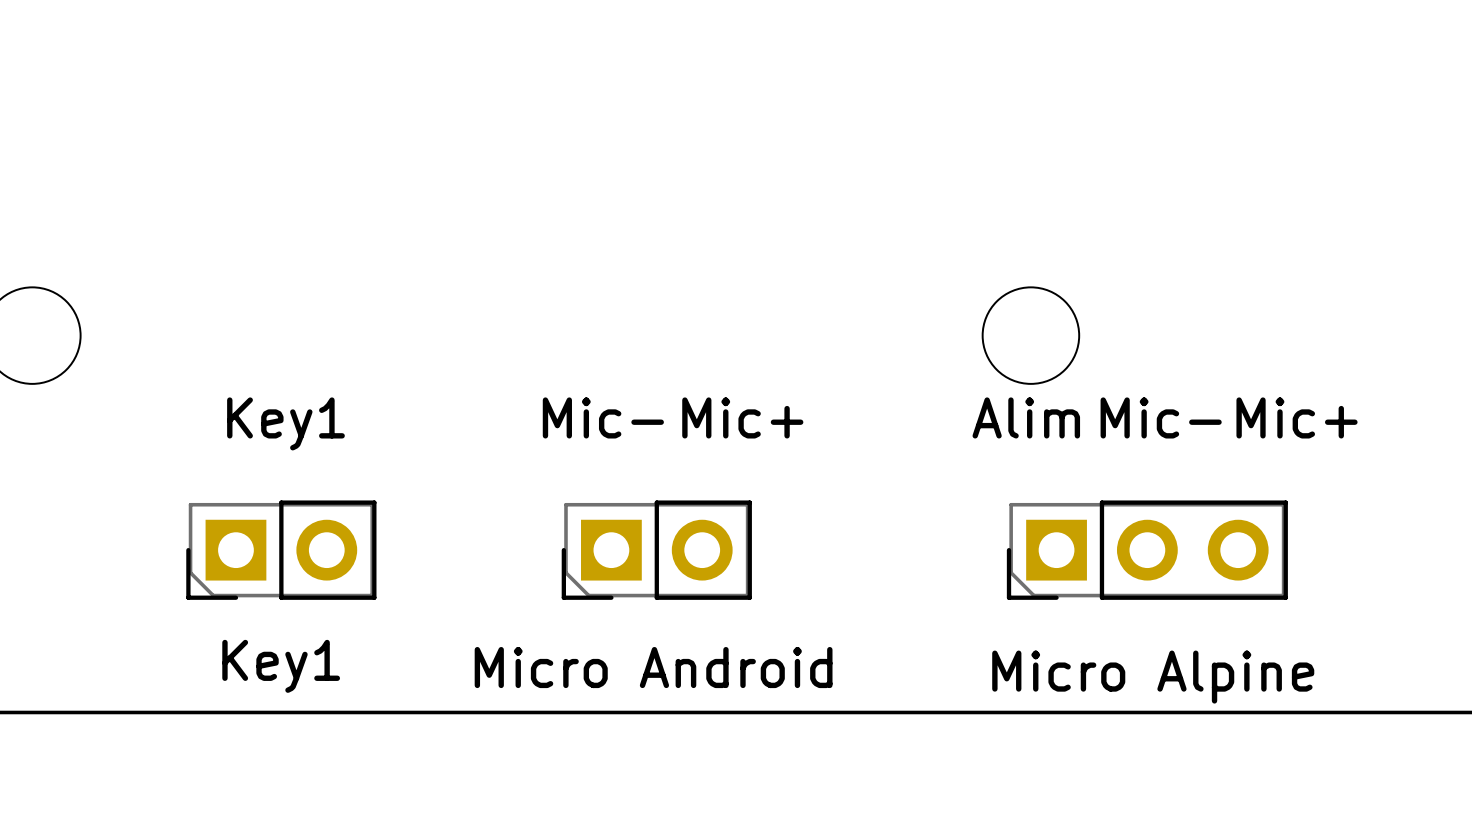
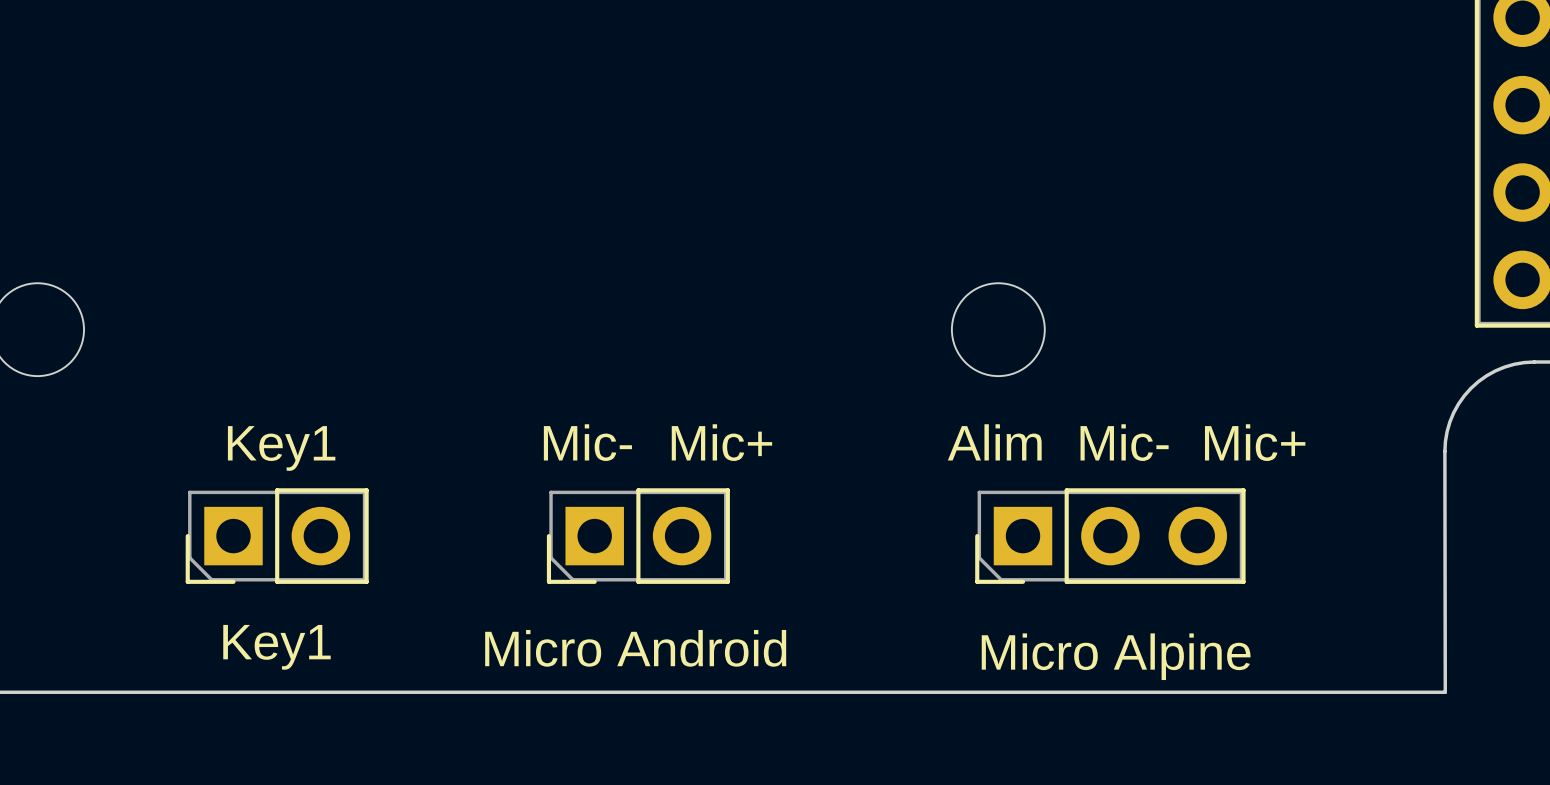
text position: Mic- (603, 417) -> Mic- (587, 442)
text position: Mic+ (742, 417) -> Mic+ (721, 442)
text position: Alim (1026, 417) -> Alim (994, 442)
text position: Mic- (1161, 417) -> Mic- (1124, 442)
text position: Mic+ (1297, 417) -> Mic+ (1255, 442)
text position: Key1 (285, 423) -> Key1 (281, 448)

